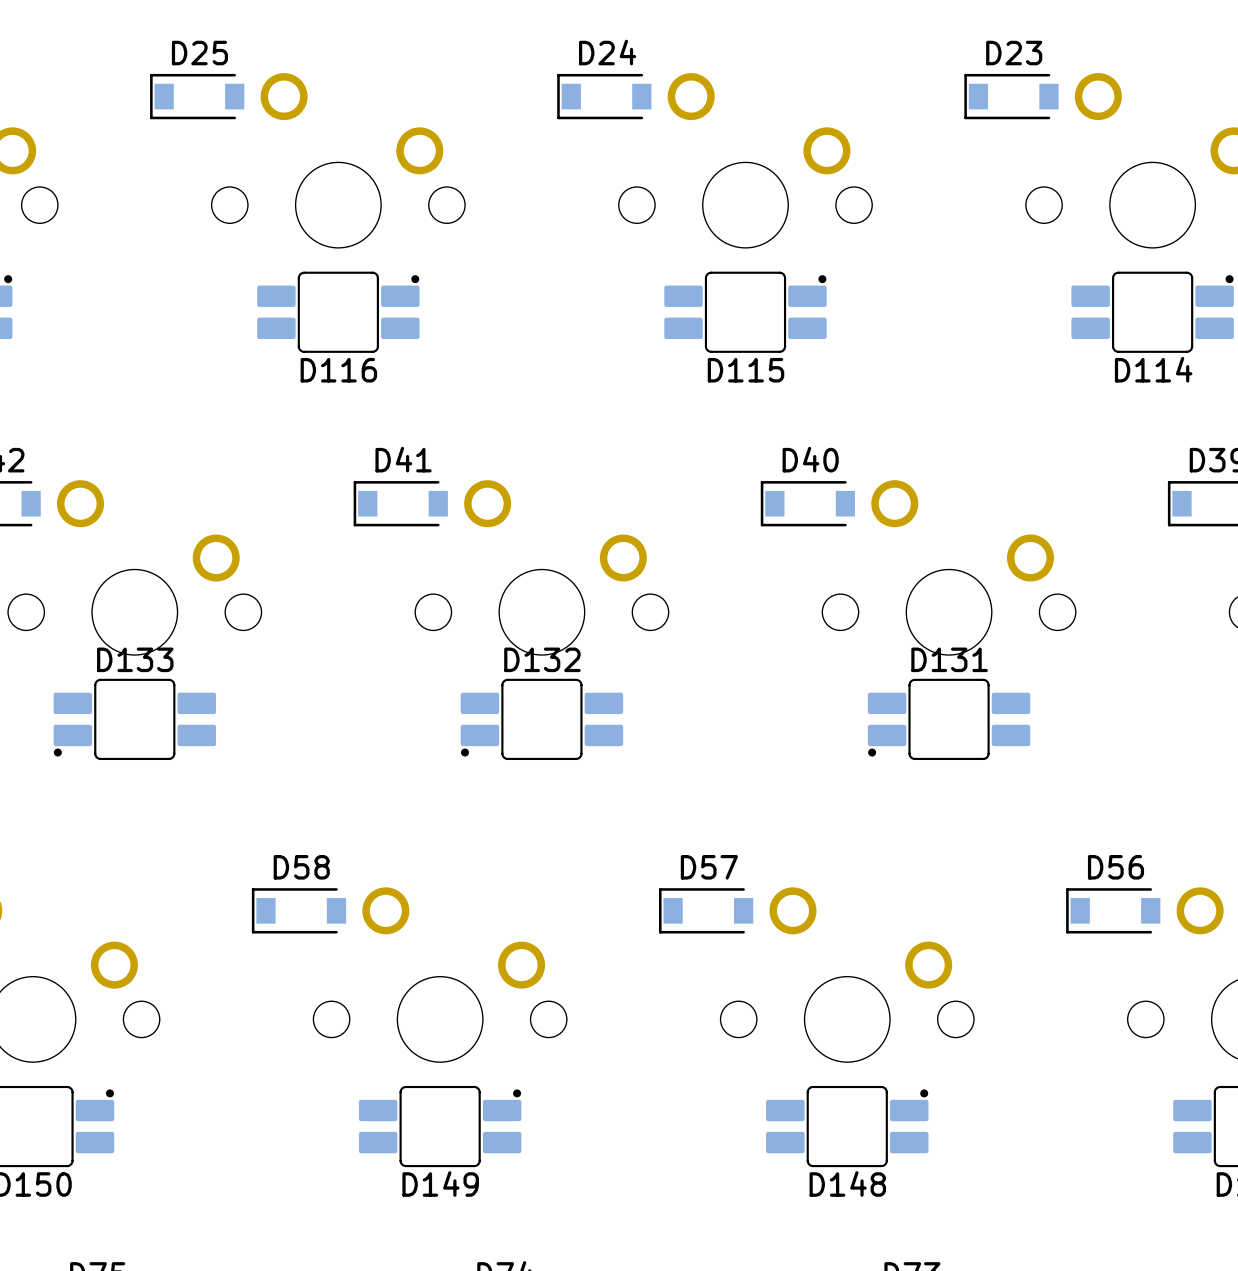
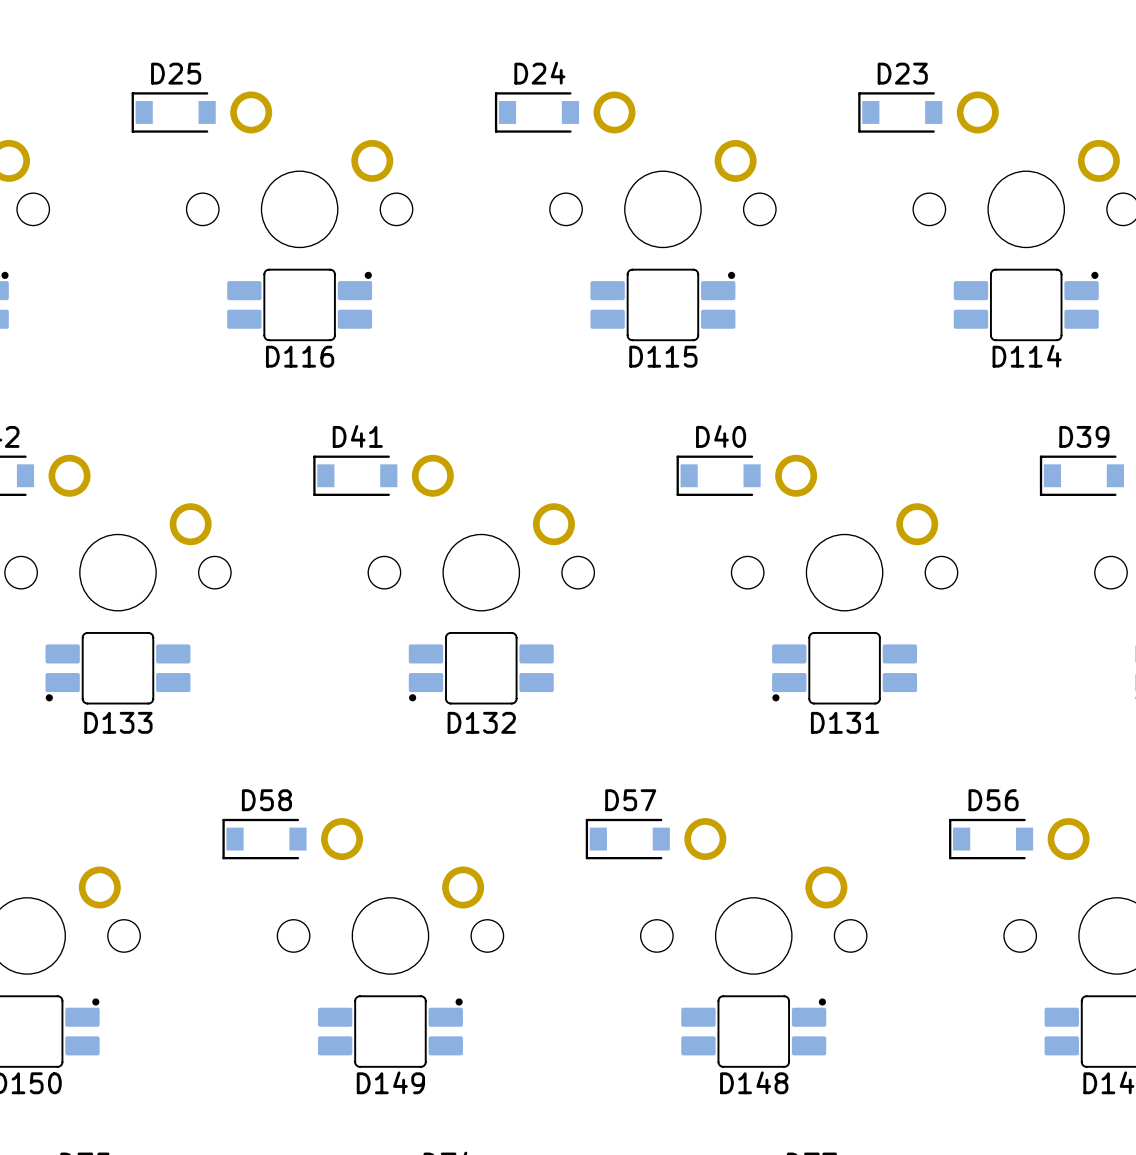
D133 name position: D133 (135, 659) -> D133 (118, 722)
D132 name position: D132 (542, 659) -> D132 (481, 722)
D131 name position: D131 (949, 659) -> D131 (845, 722)

